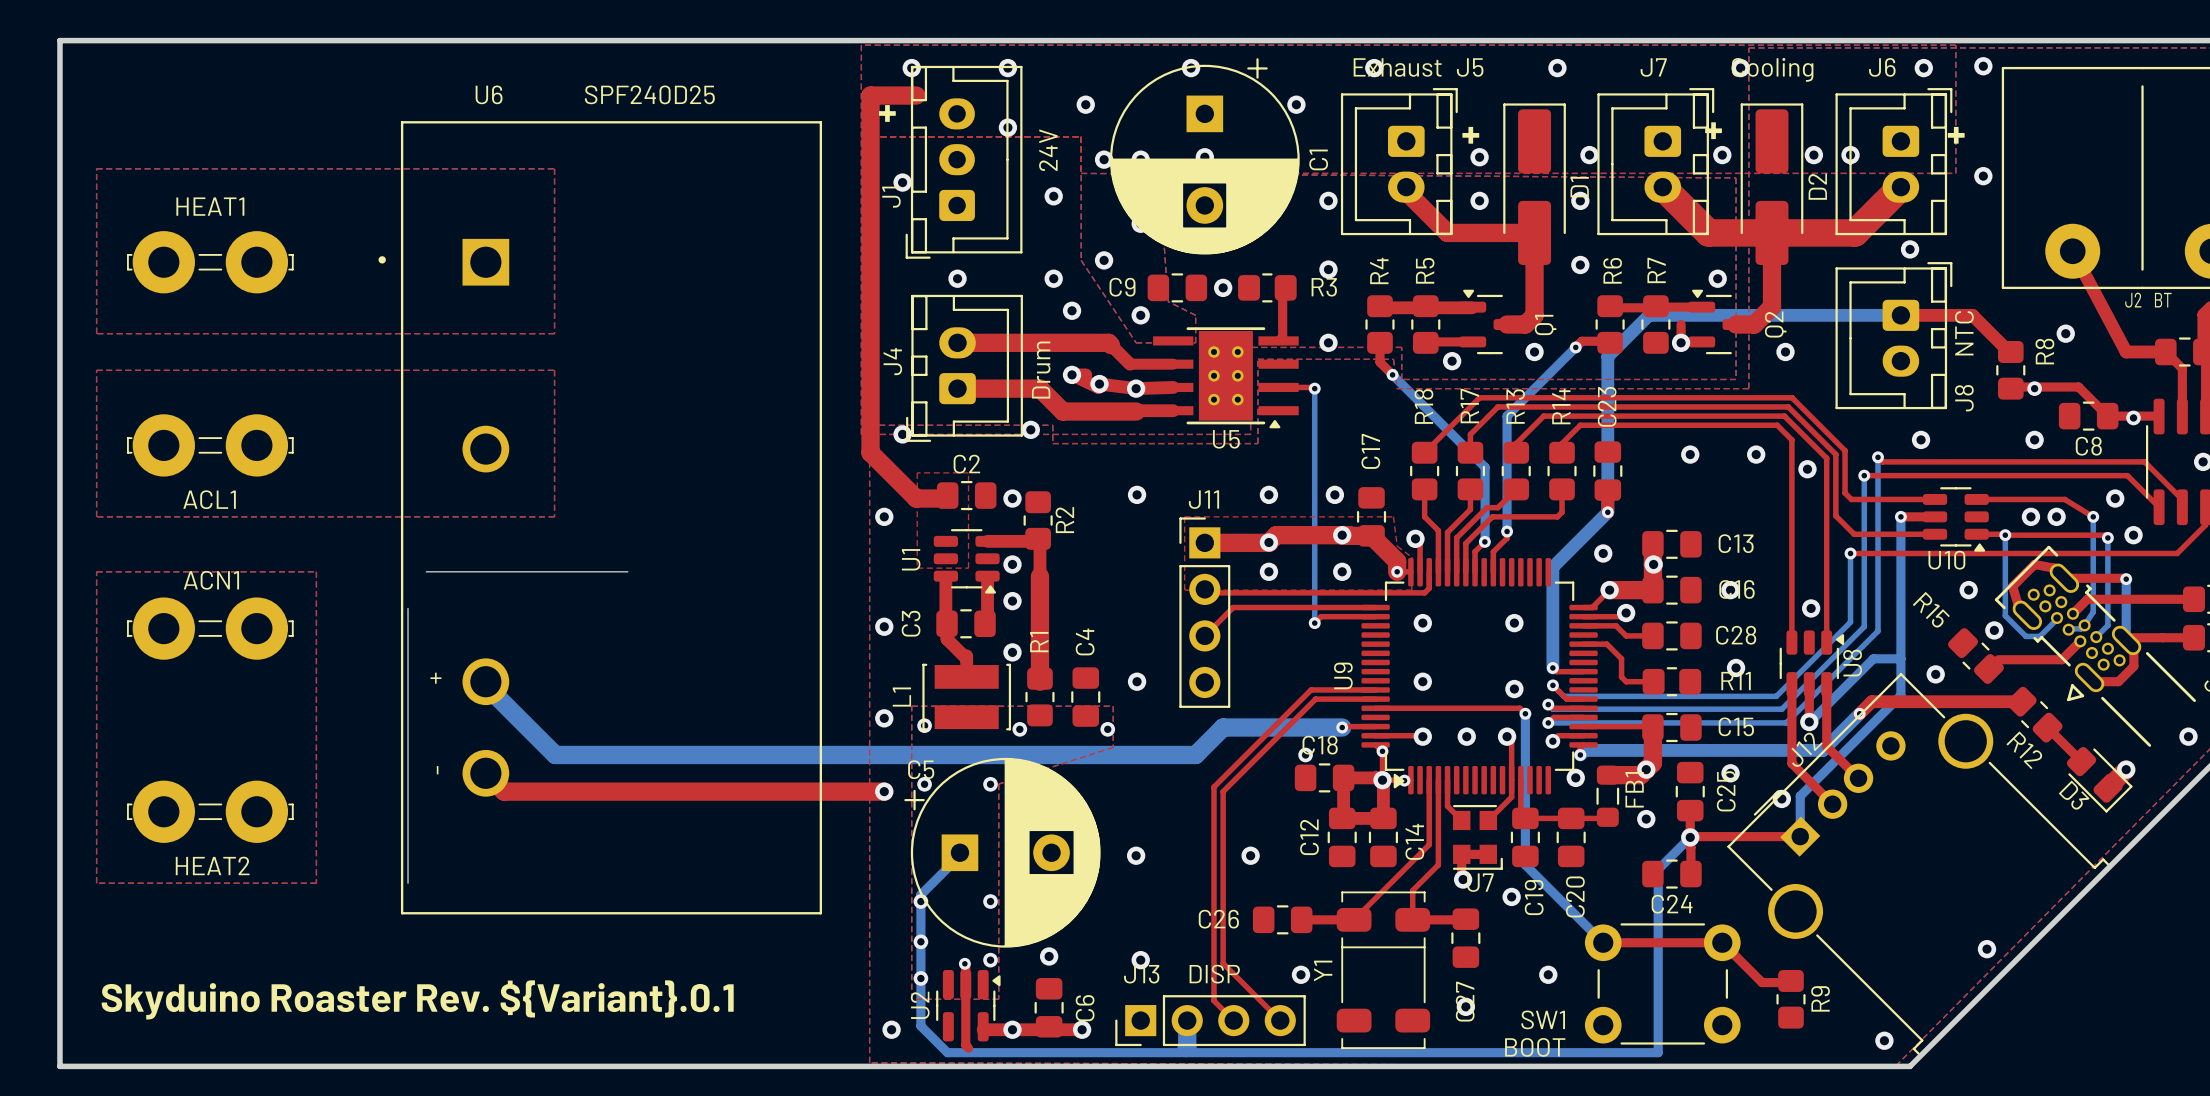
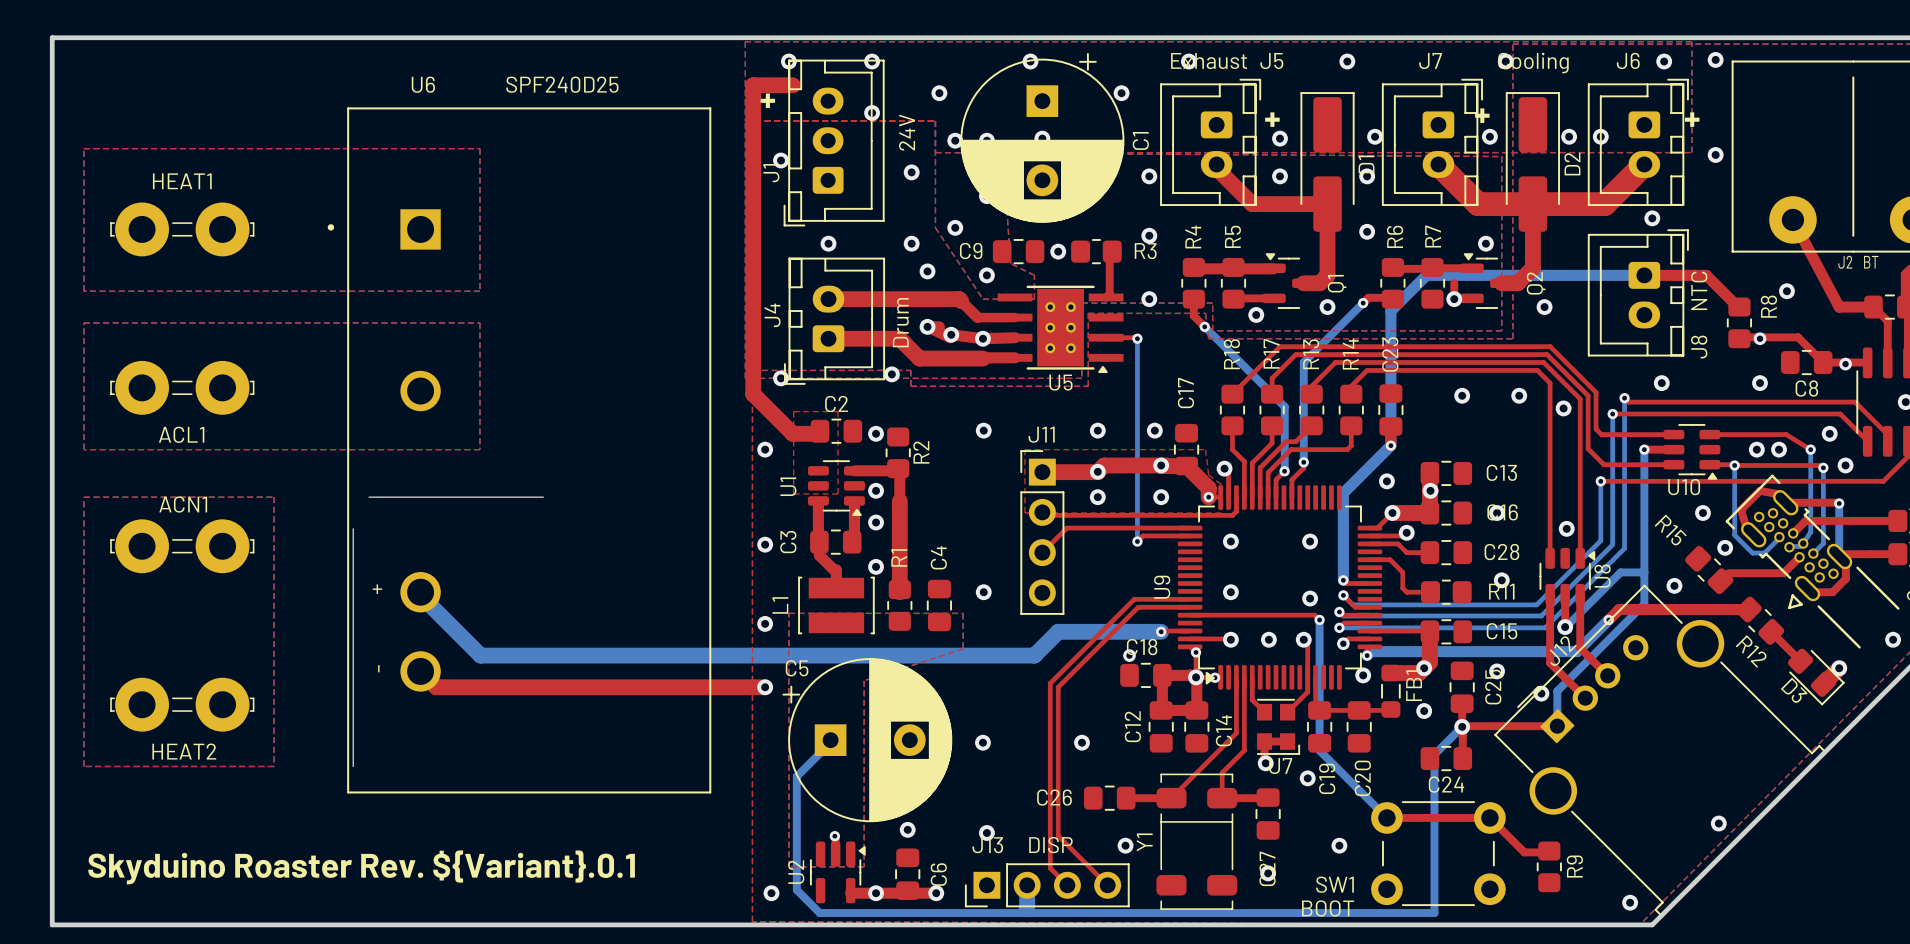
via: (924, 725) -> none
via: (1019, 729) -> none
via: (1107, 729) -> none
via: (924, 784) -> none
via: (990, 784) -> none
via: (920, 901) -> none
via: (990, 901) -> none
via: (920, 941) -> none
via: (990, 960) -> none
via: (920, 978) -> none
top track: (965, 984) (965, 1045) (968, 1048) -> none

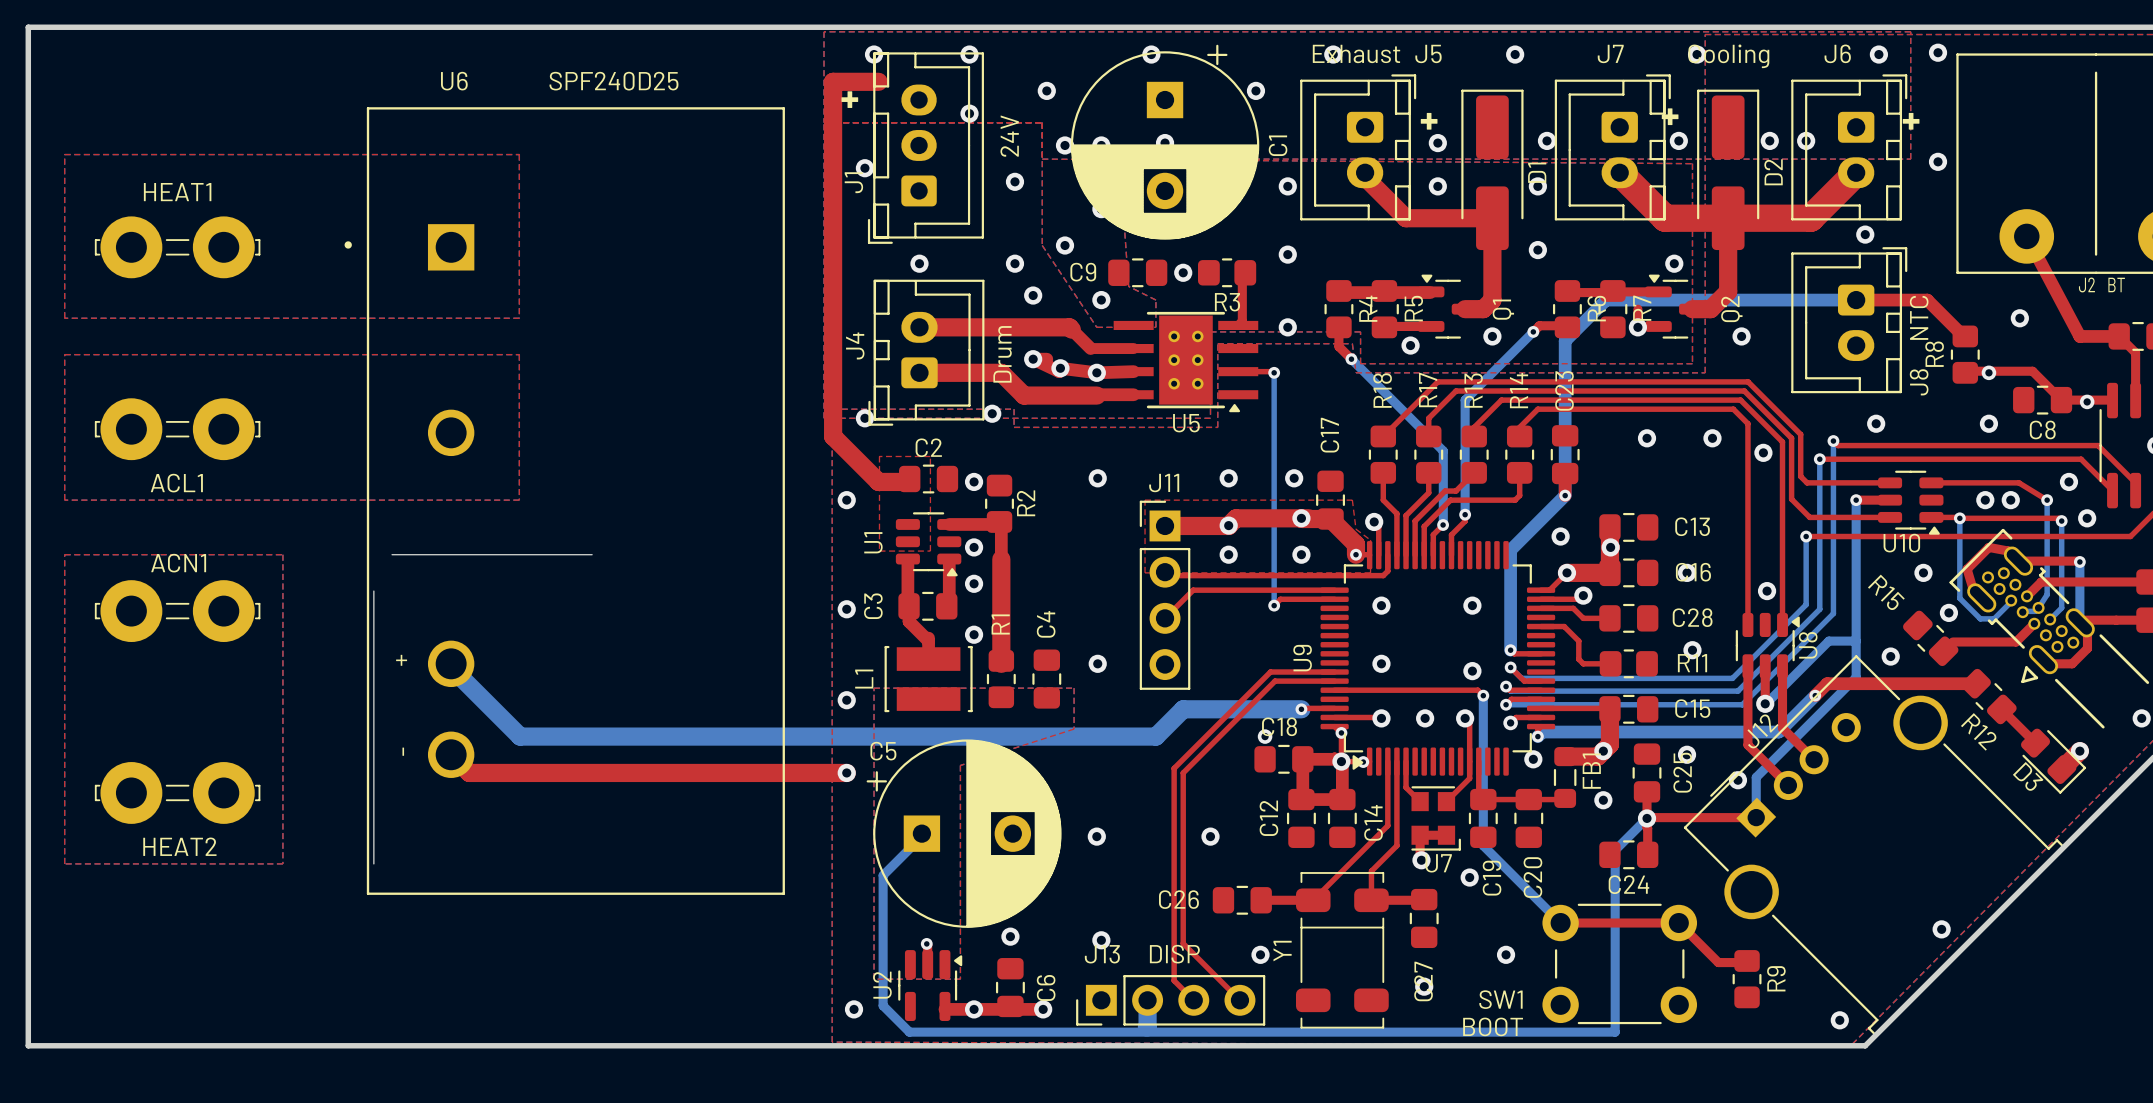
R4 name position: R4 (1193, 236) -> R4 (1368, 308)
R5 name position: R5 (1232, 236) -> R5 (1413, 308)
R6 name position: R6 (1395, 236) -> R6 (1596, 308)
R7 name position: R7 (1433, 236) -> R7 (1642, 308)
R3 name position: R3 (1145, 251) -> R3 (1227, 302)
R8 name position: R8 (1768, 306) -> R8 (1934, 354)
text: Skyduino Roaster Rev. ${Variant}.0.1 (361, 867) -> none

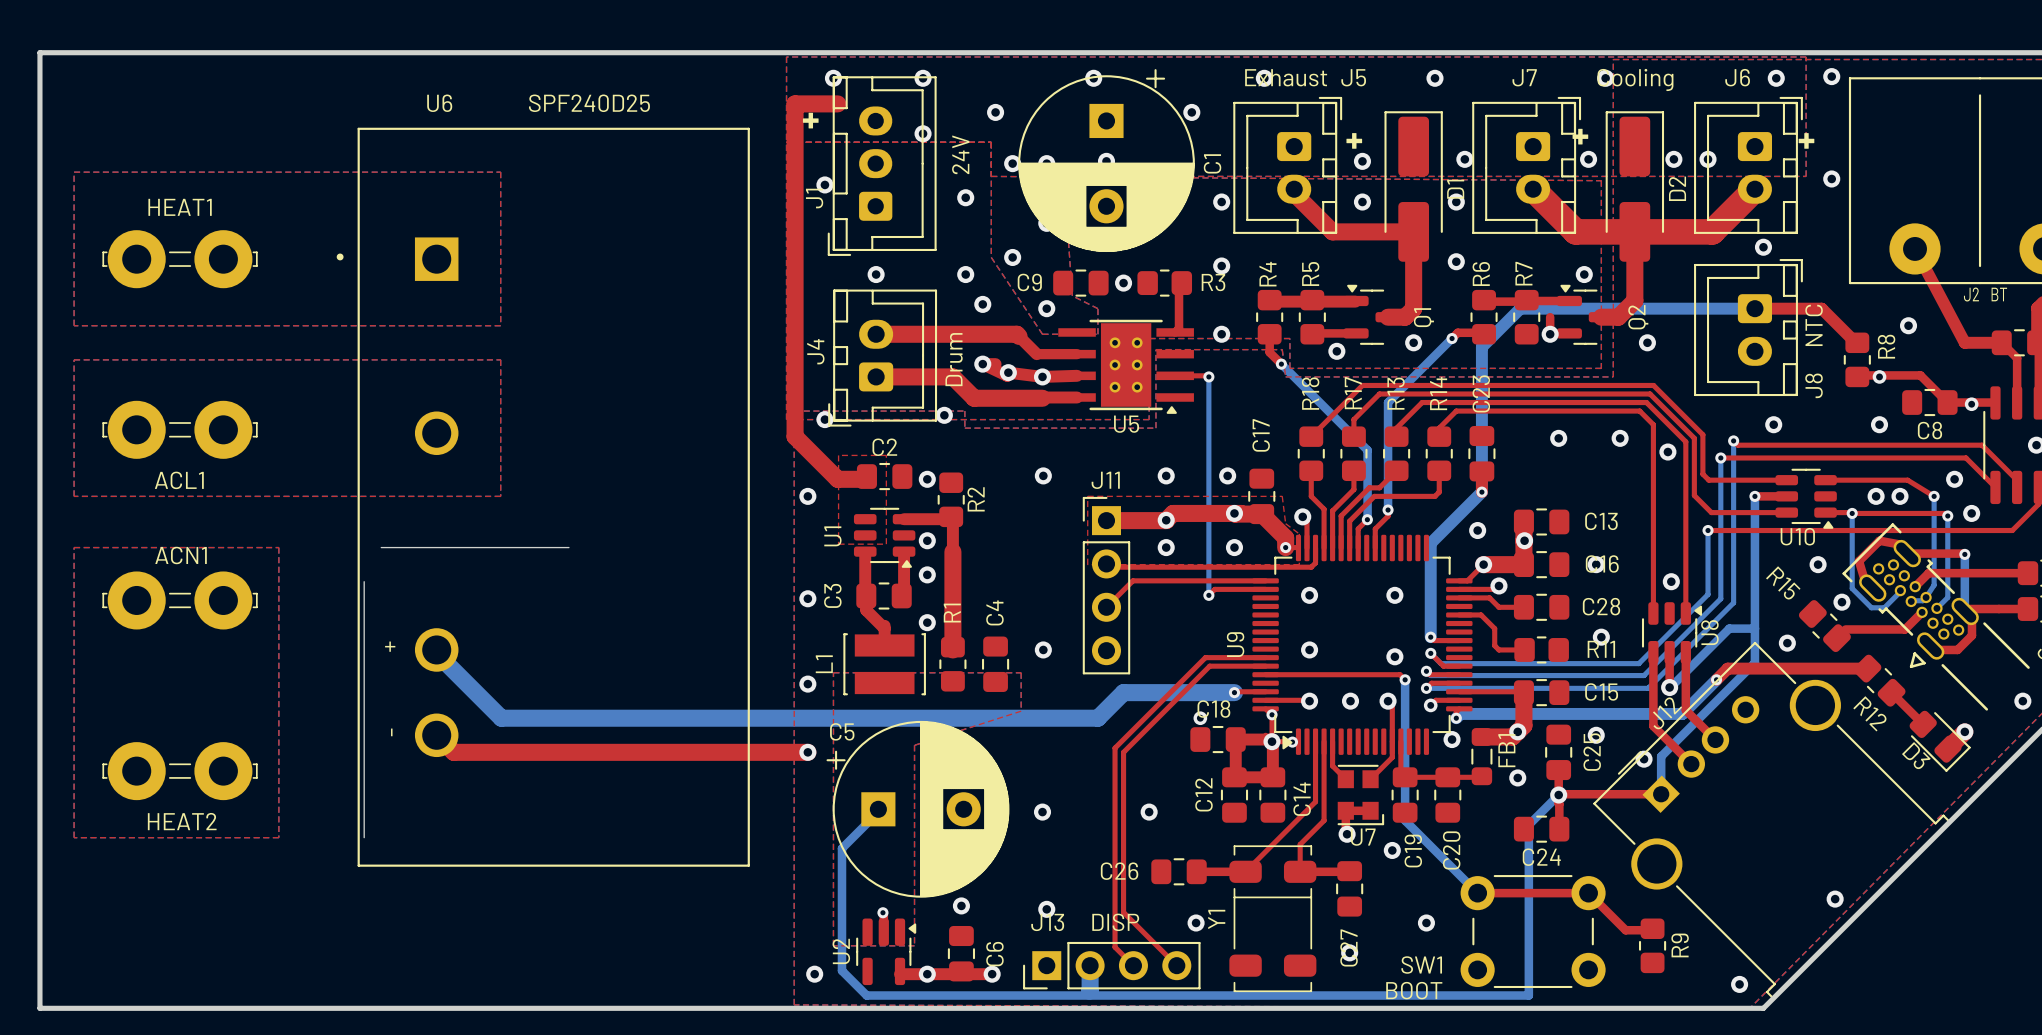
R3 name position: R3 (1227, 302) -> R3 (1213, 282)
R4 name position: R4 (1368, 308) -> R4 (1267, 274)
R5 name position: R5 (1413, 308) -> R5 (1310, 274)
R6 name position: R6 (1596, 308) -> R6 (1481, 274)
R7 name position: R7 (1642, 308) -> R7 (1523, 273)
R8 name position: R8 (1934, 354) -> R8 (1886, 346)

